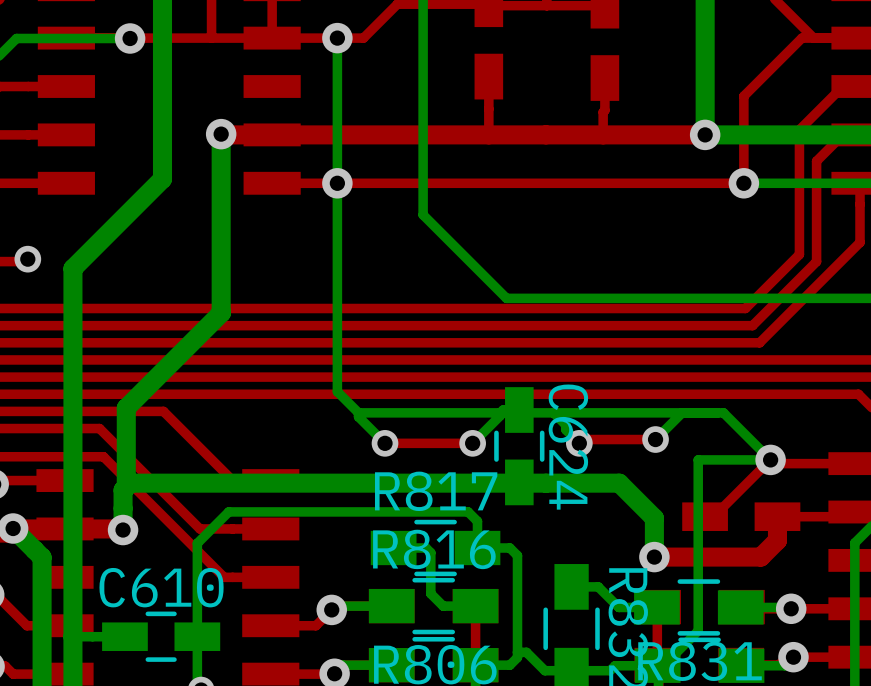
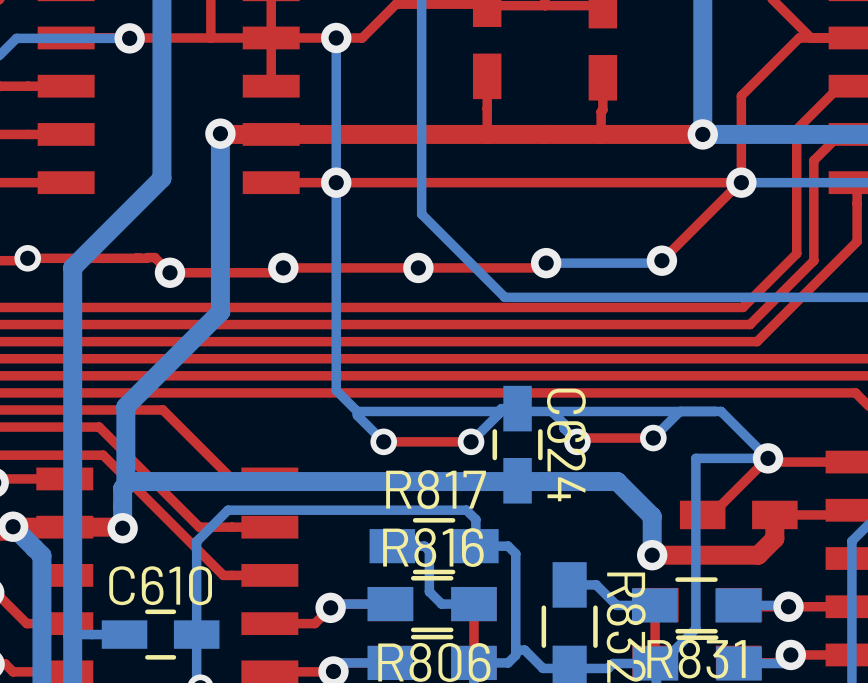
top track: none -> (271, 37) (271, 86)
top track: none -> (739, 182) (661, 260)
top track: none -> (27, 258) (154, 257) (169, 272) (278, 272) (283, 267) (541, 267) (546, 263)
bottom track: none -> (661, 260) (659, 263) (546, 263)
via: none -> (661, 260)
via: none -> (546, 263)
via: none -> (283, 267)
via: none -> (418, 267)
via: none -> (169, 272)

